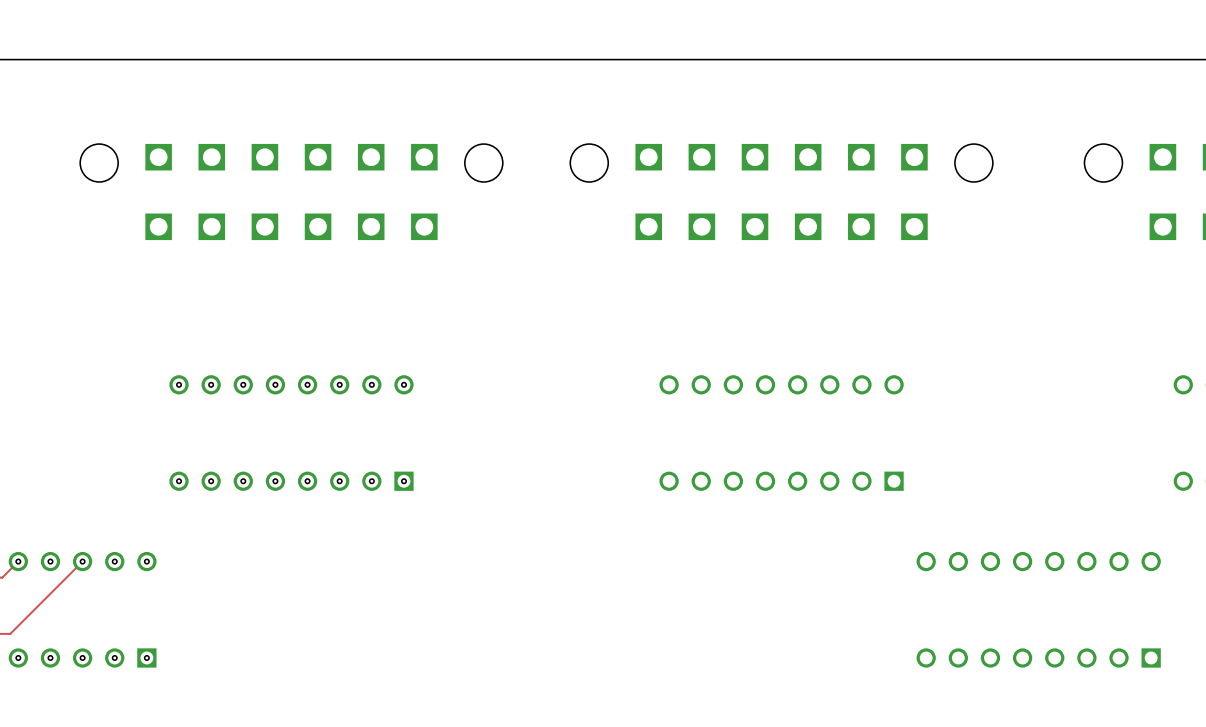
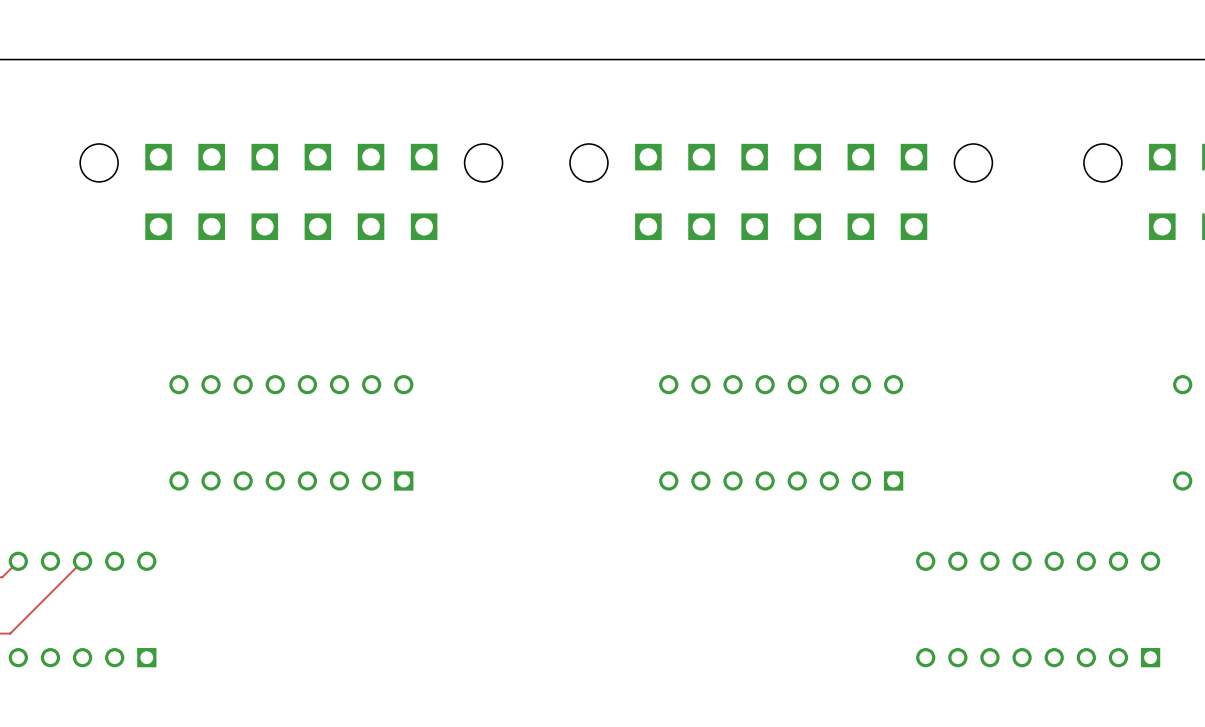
hole: (179, 384) -> none
hole: (211, 384) -> none
hole: (243, 384) -> none
hole: (275, 384) -> none
hole: (307, 384) -> none
hole: (339, 384) -> none
hole: (371, 384) -> none
hole: (403, 384) -> none
hole: (179, 481) -> none
hole: (211, 481) -> none
hole: (243, 481) -> none
hole: (275, 481) -> none
hole: (307, 481) -> none
hole: (339, 481) -> none
hole: (371, 481) -> none
hole: (403, 481) -> none
hole: (18, 561) -> none
hole: (50, 561) -> none
hole: (82, 561) -> none
hole: (114, 561) -> none
hole: (146, 561) -> none
hole: (18, 657) -> none
hole: (50, 657) -> none
hole: (82, 657) -> none
hole: (114, 657) -> none
hole: (146, 657) -> none

